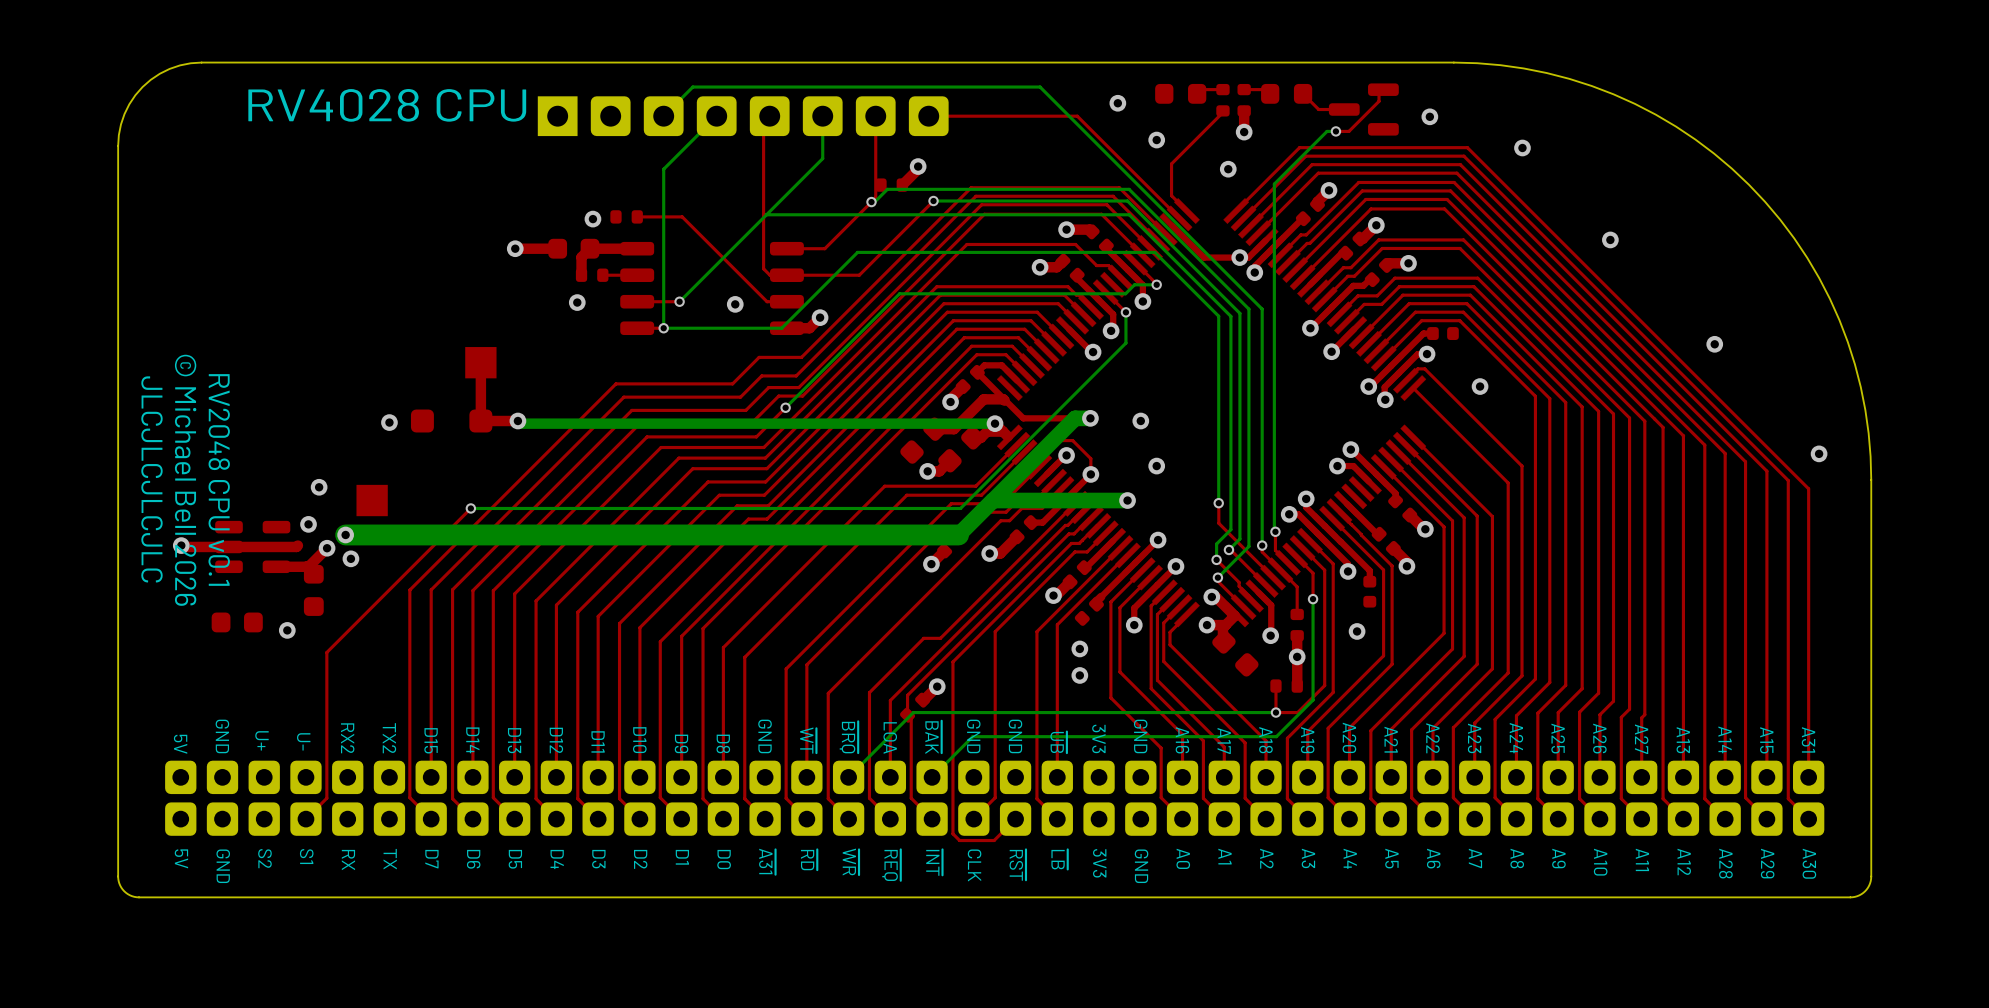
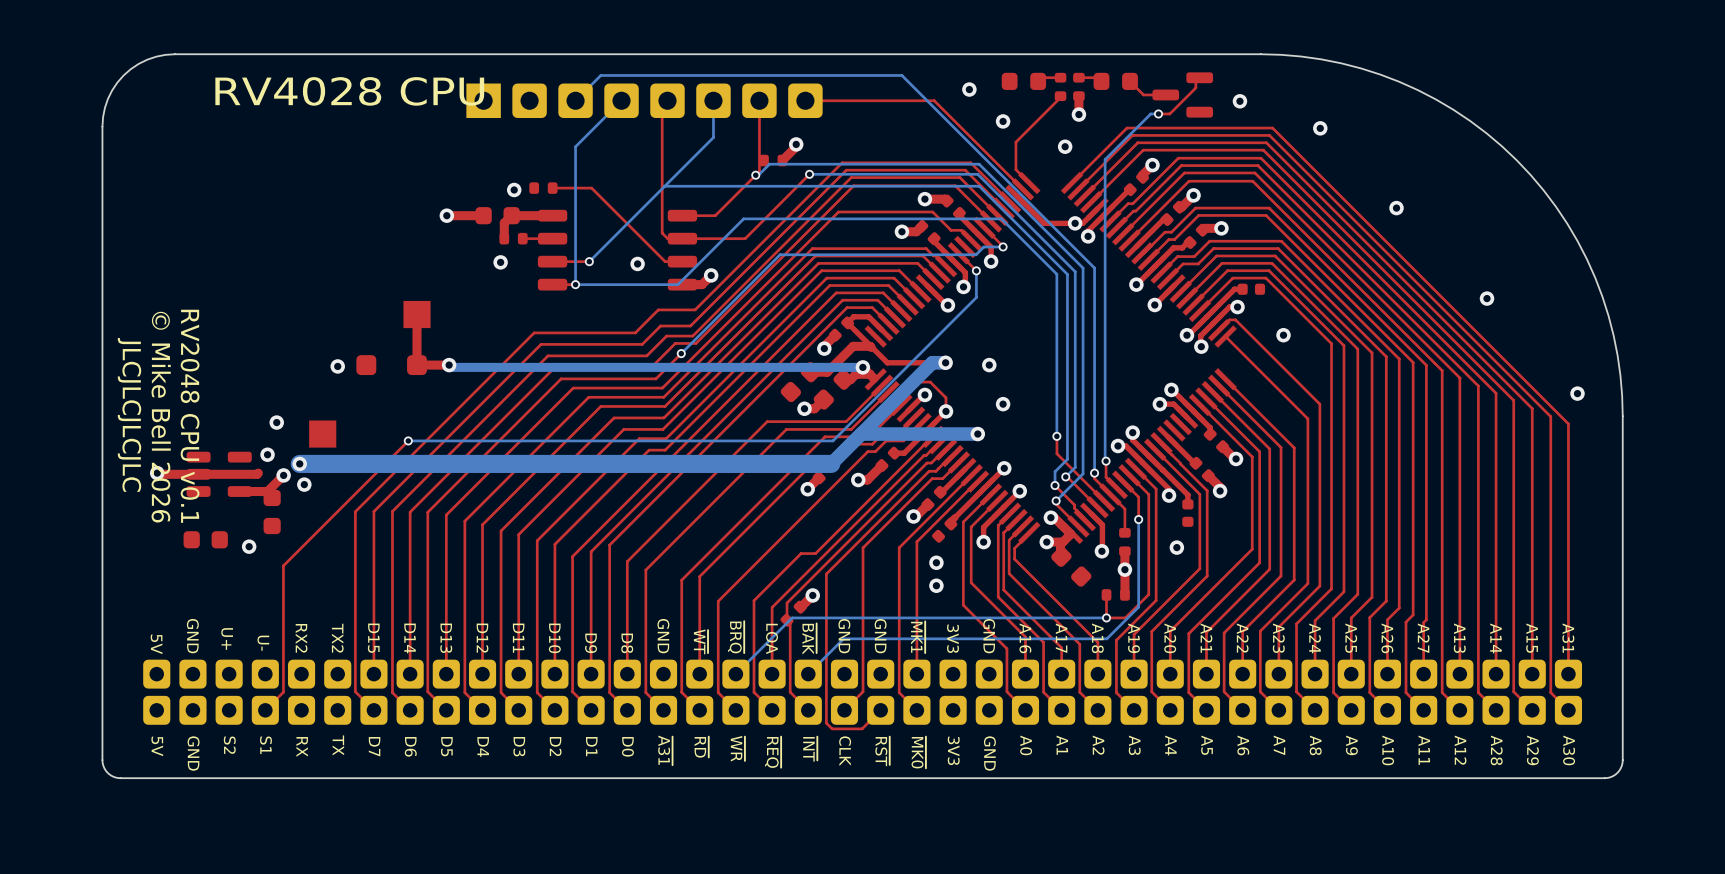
text: © Michael Bell 2026 (185, 480) -> © Mike Bell 2026 (161, 417)
part text: ~{UB} (1058, 742) -> ~{MK1} (918, 637)
part text: ~{LB} (1059, 859) -> ~{MK0} (918, 752)

